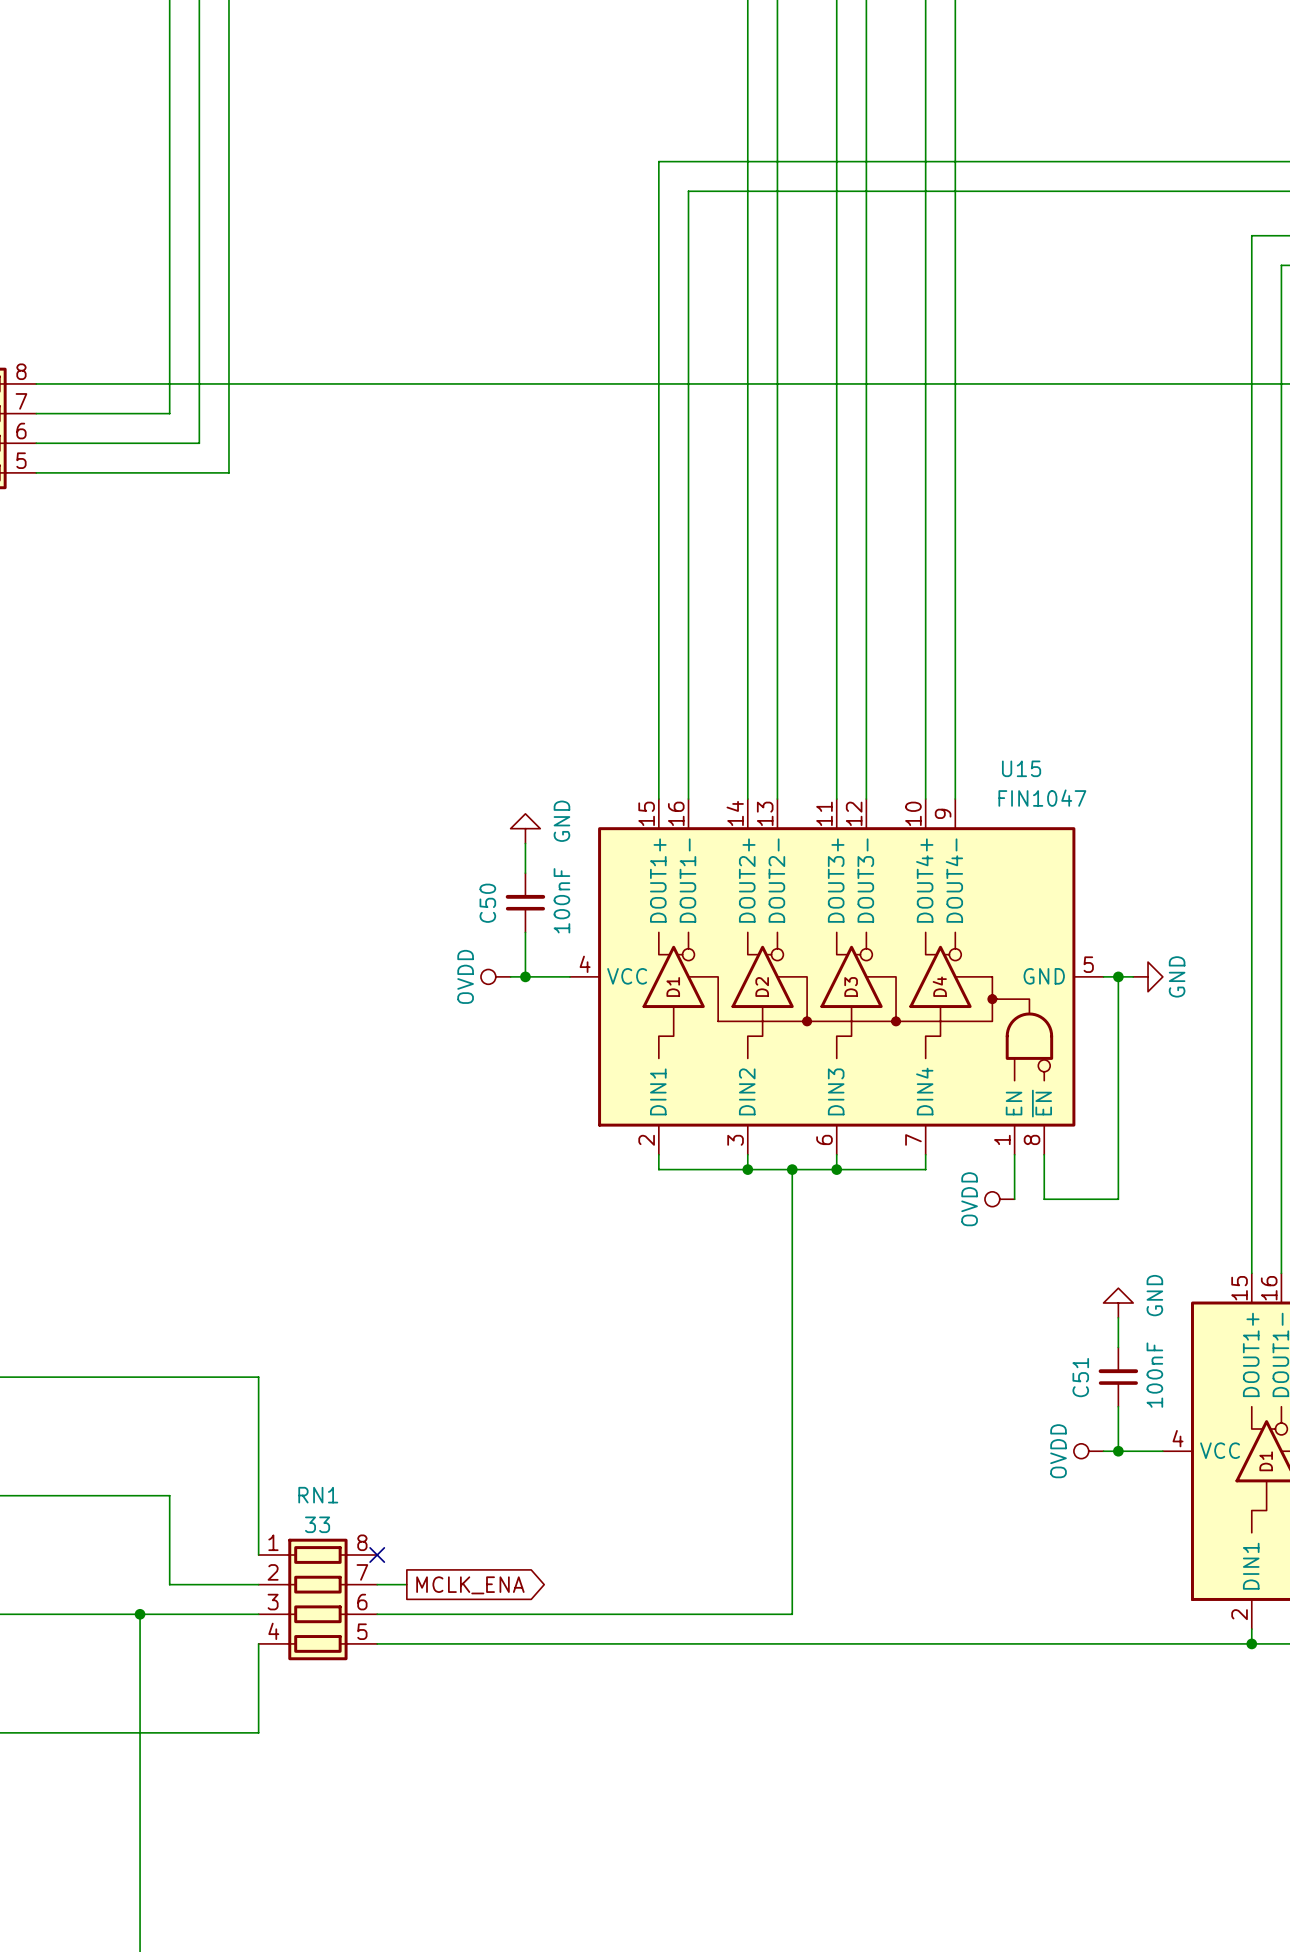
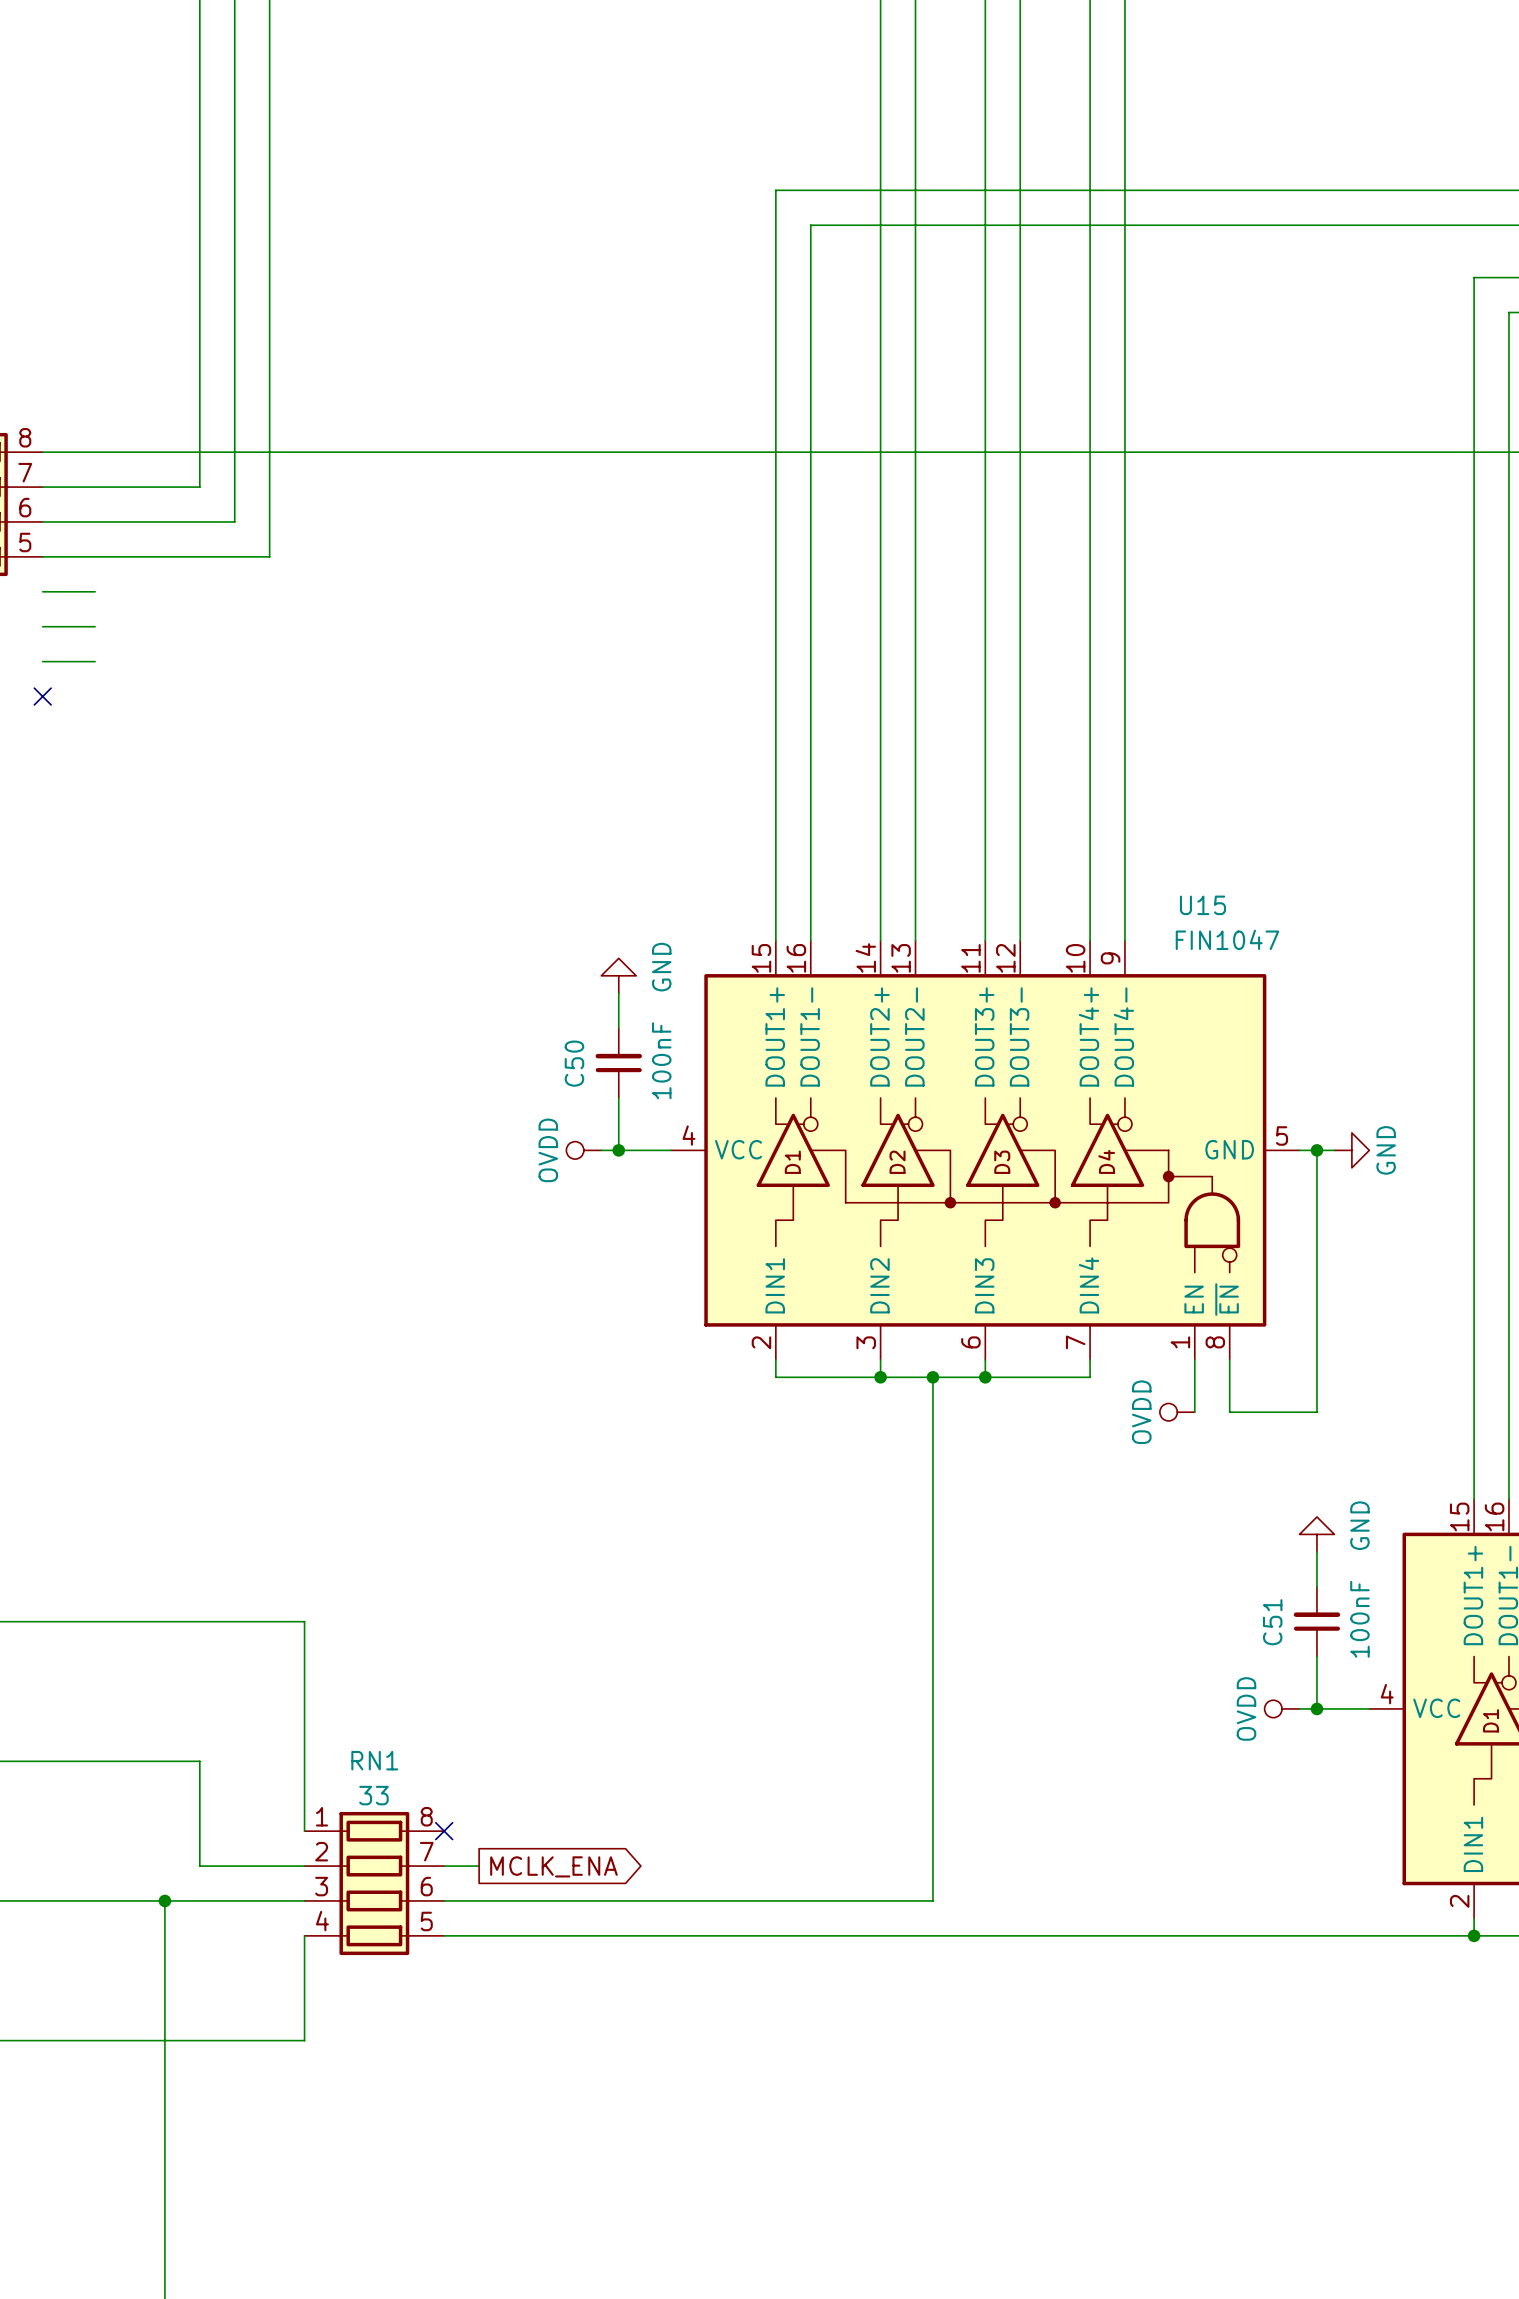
wire: none -> (42, 591) (95, 591)
wire: none -> (42, 626) (95, 626)
wire: none -> (42, 661) (95, 661)
no-connect mark: none -> (42, 696)

